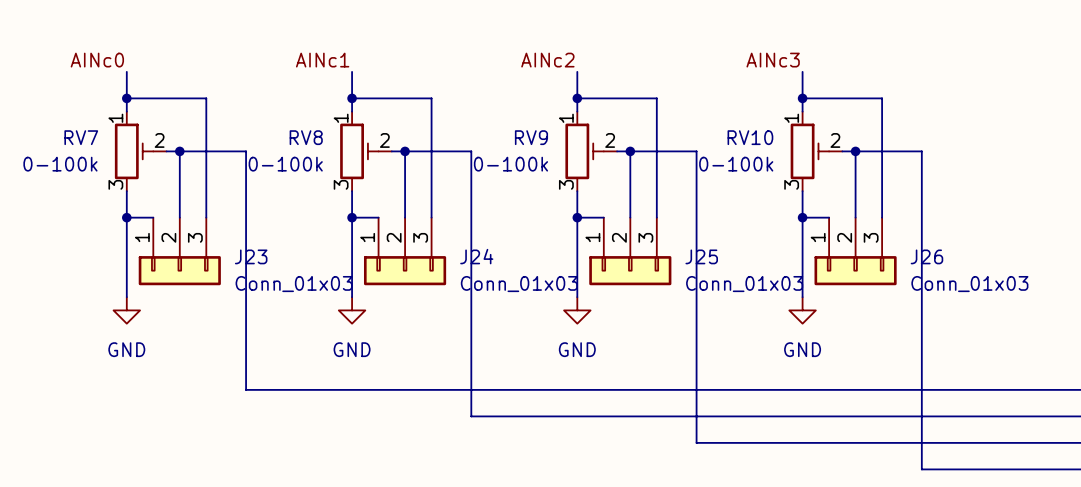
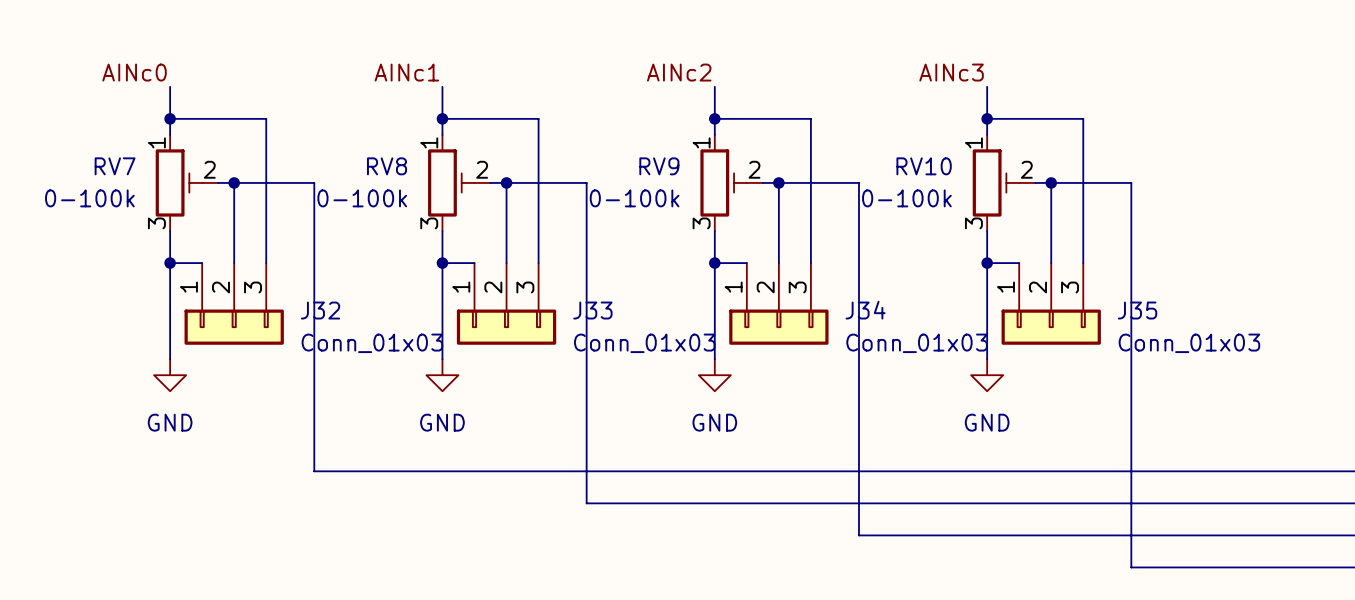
J23 name: J23 (251, 256) -> J32 (320, 310)
J24 name: J24 (476, 256) -> J33 (592, 310)
J25 name: J25 (701, 256) -> J34 (865, 310)
J26 name: J26 (926, 256) -> J35 (1137, 310)

